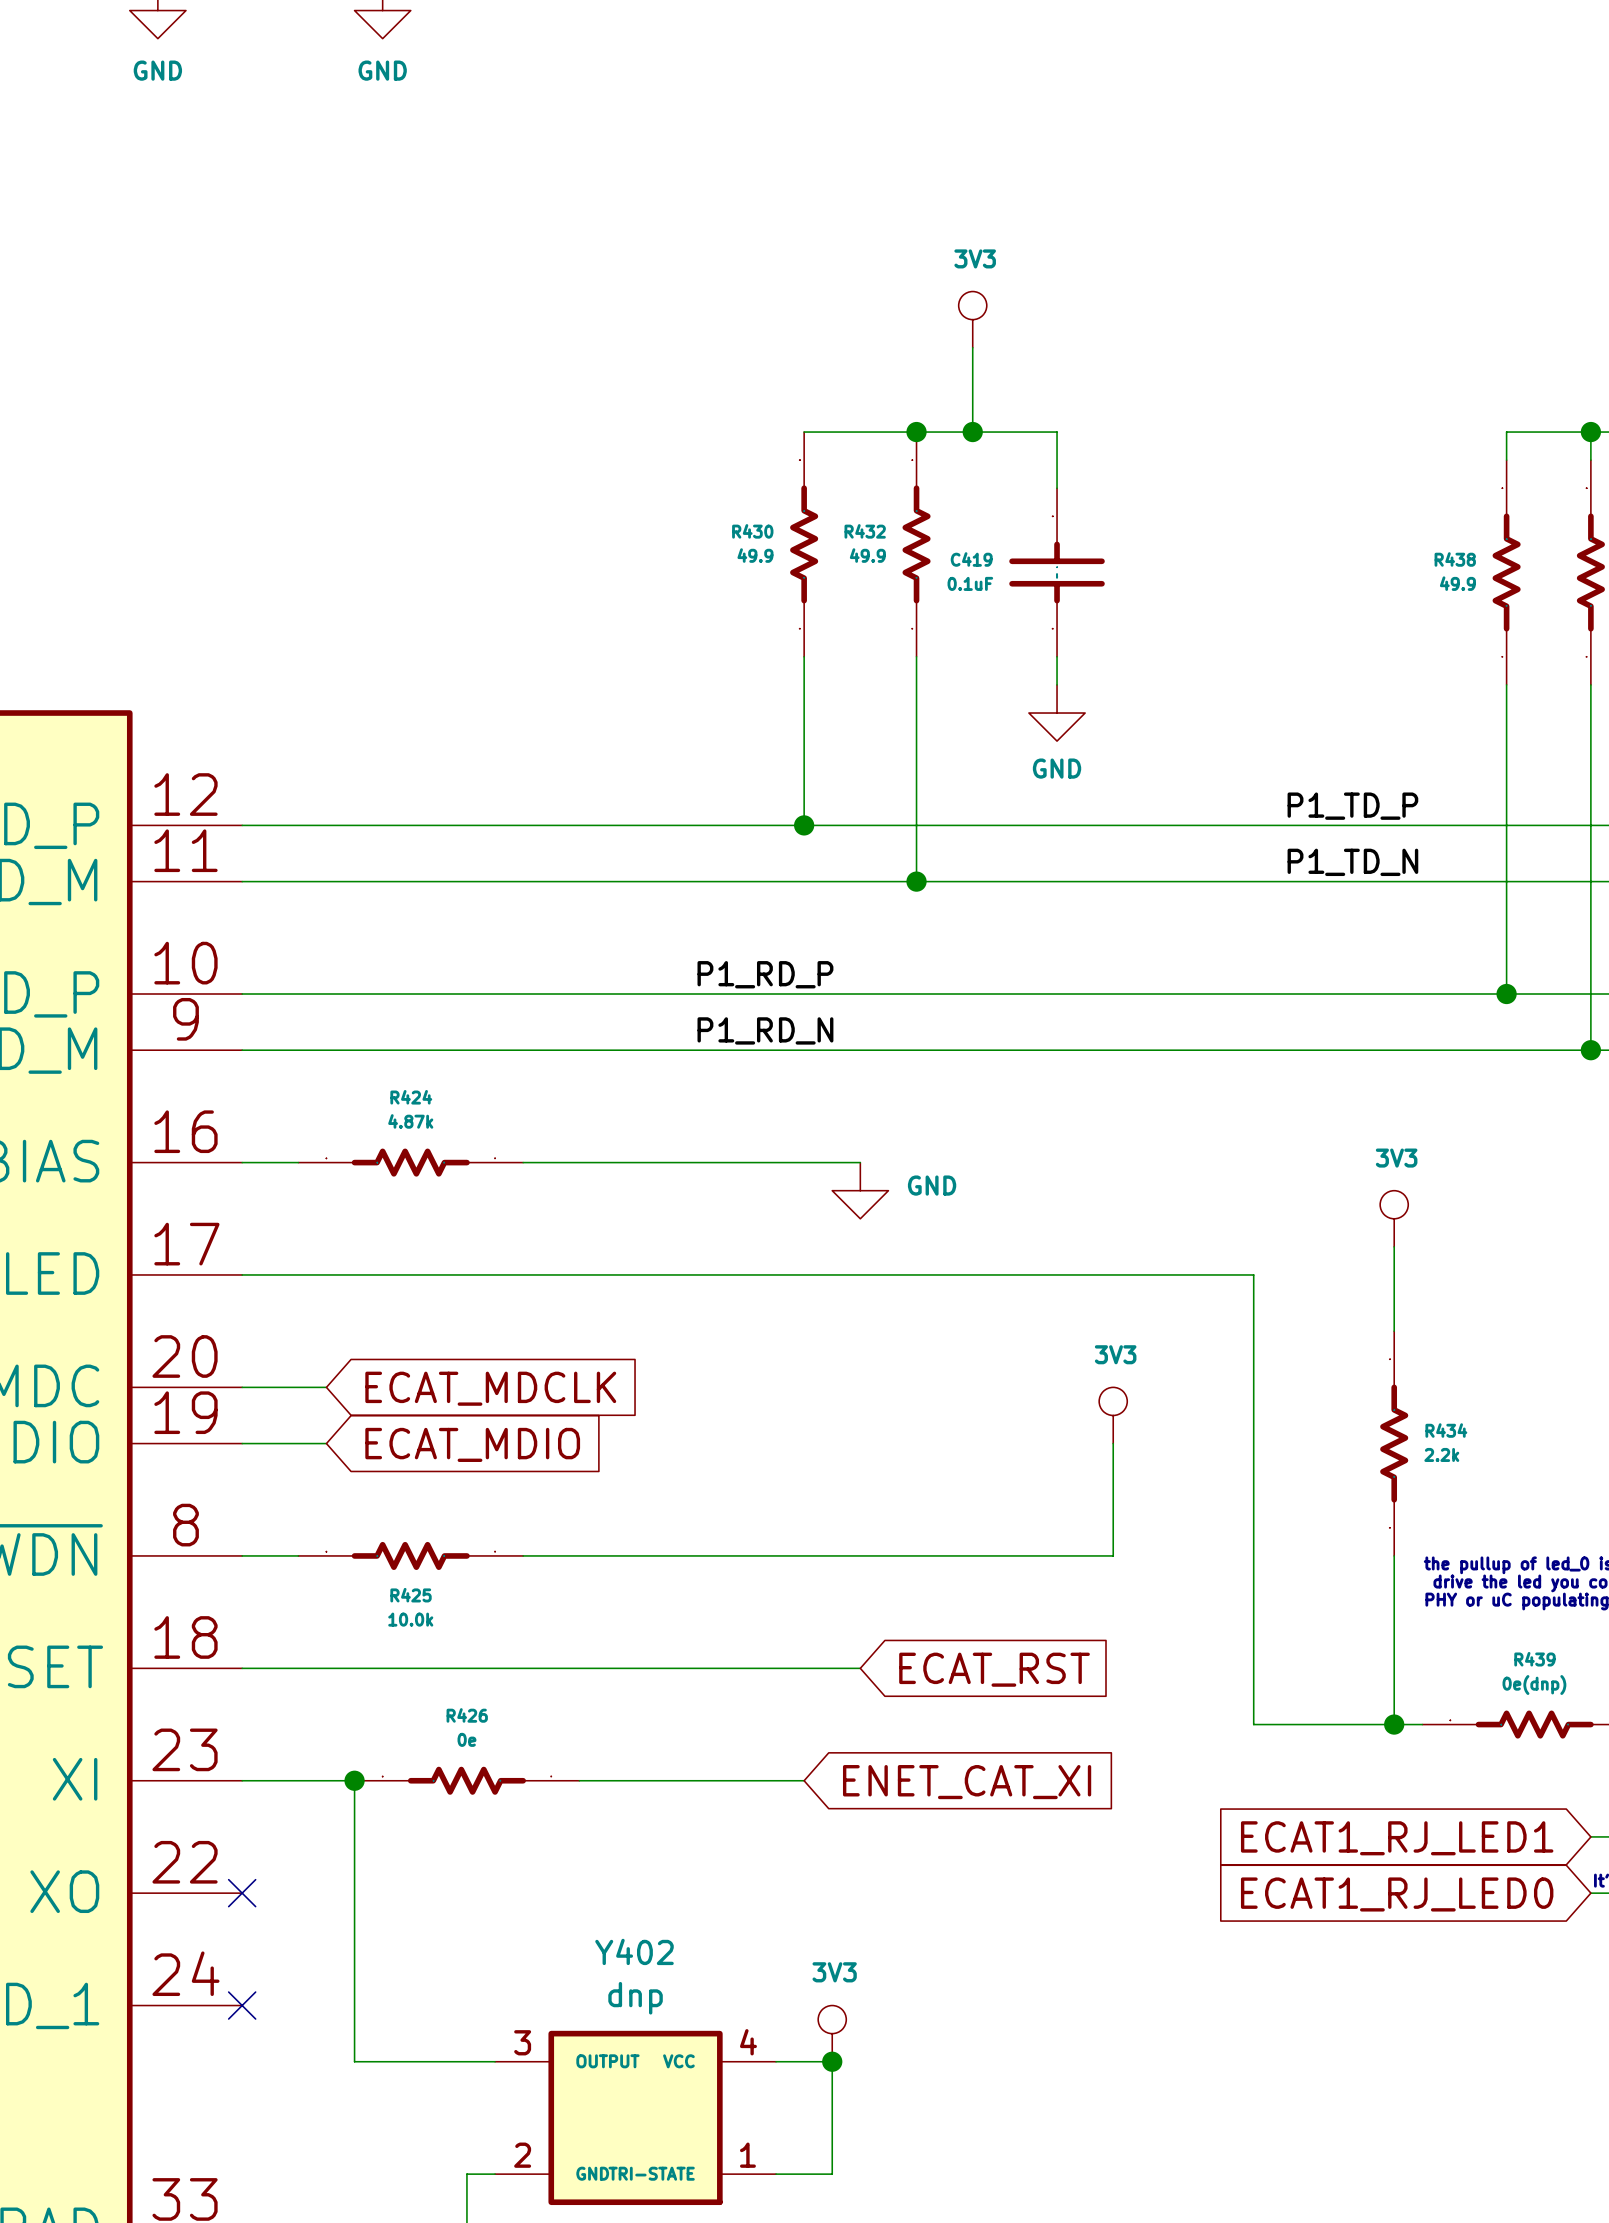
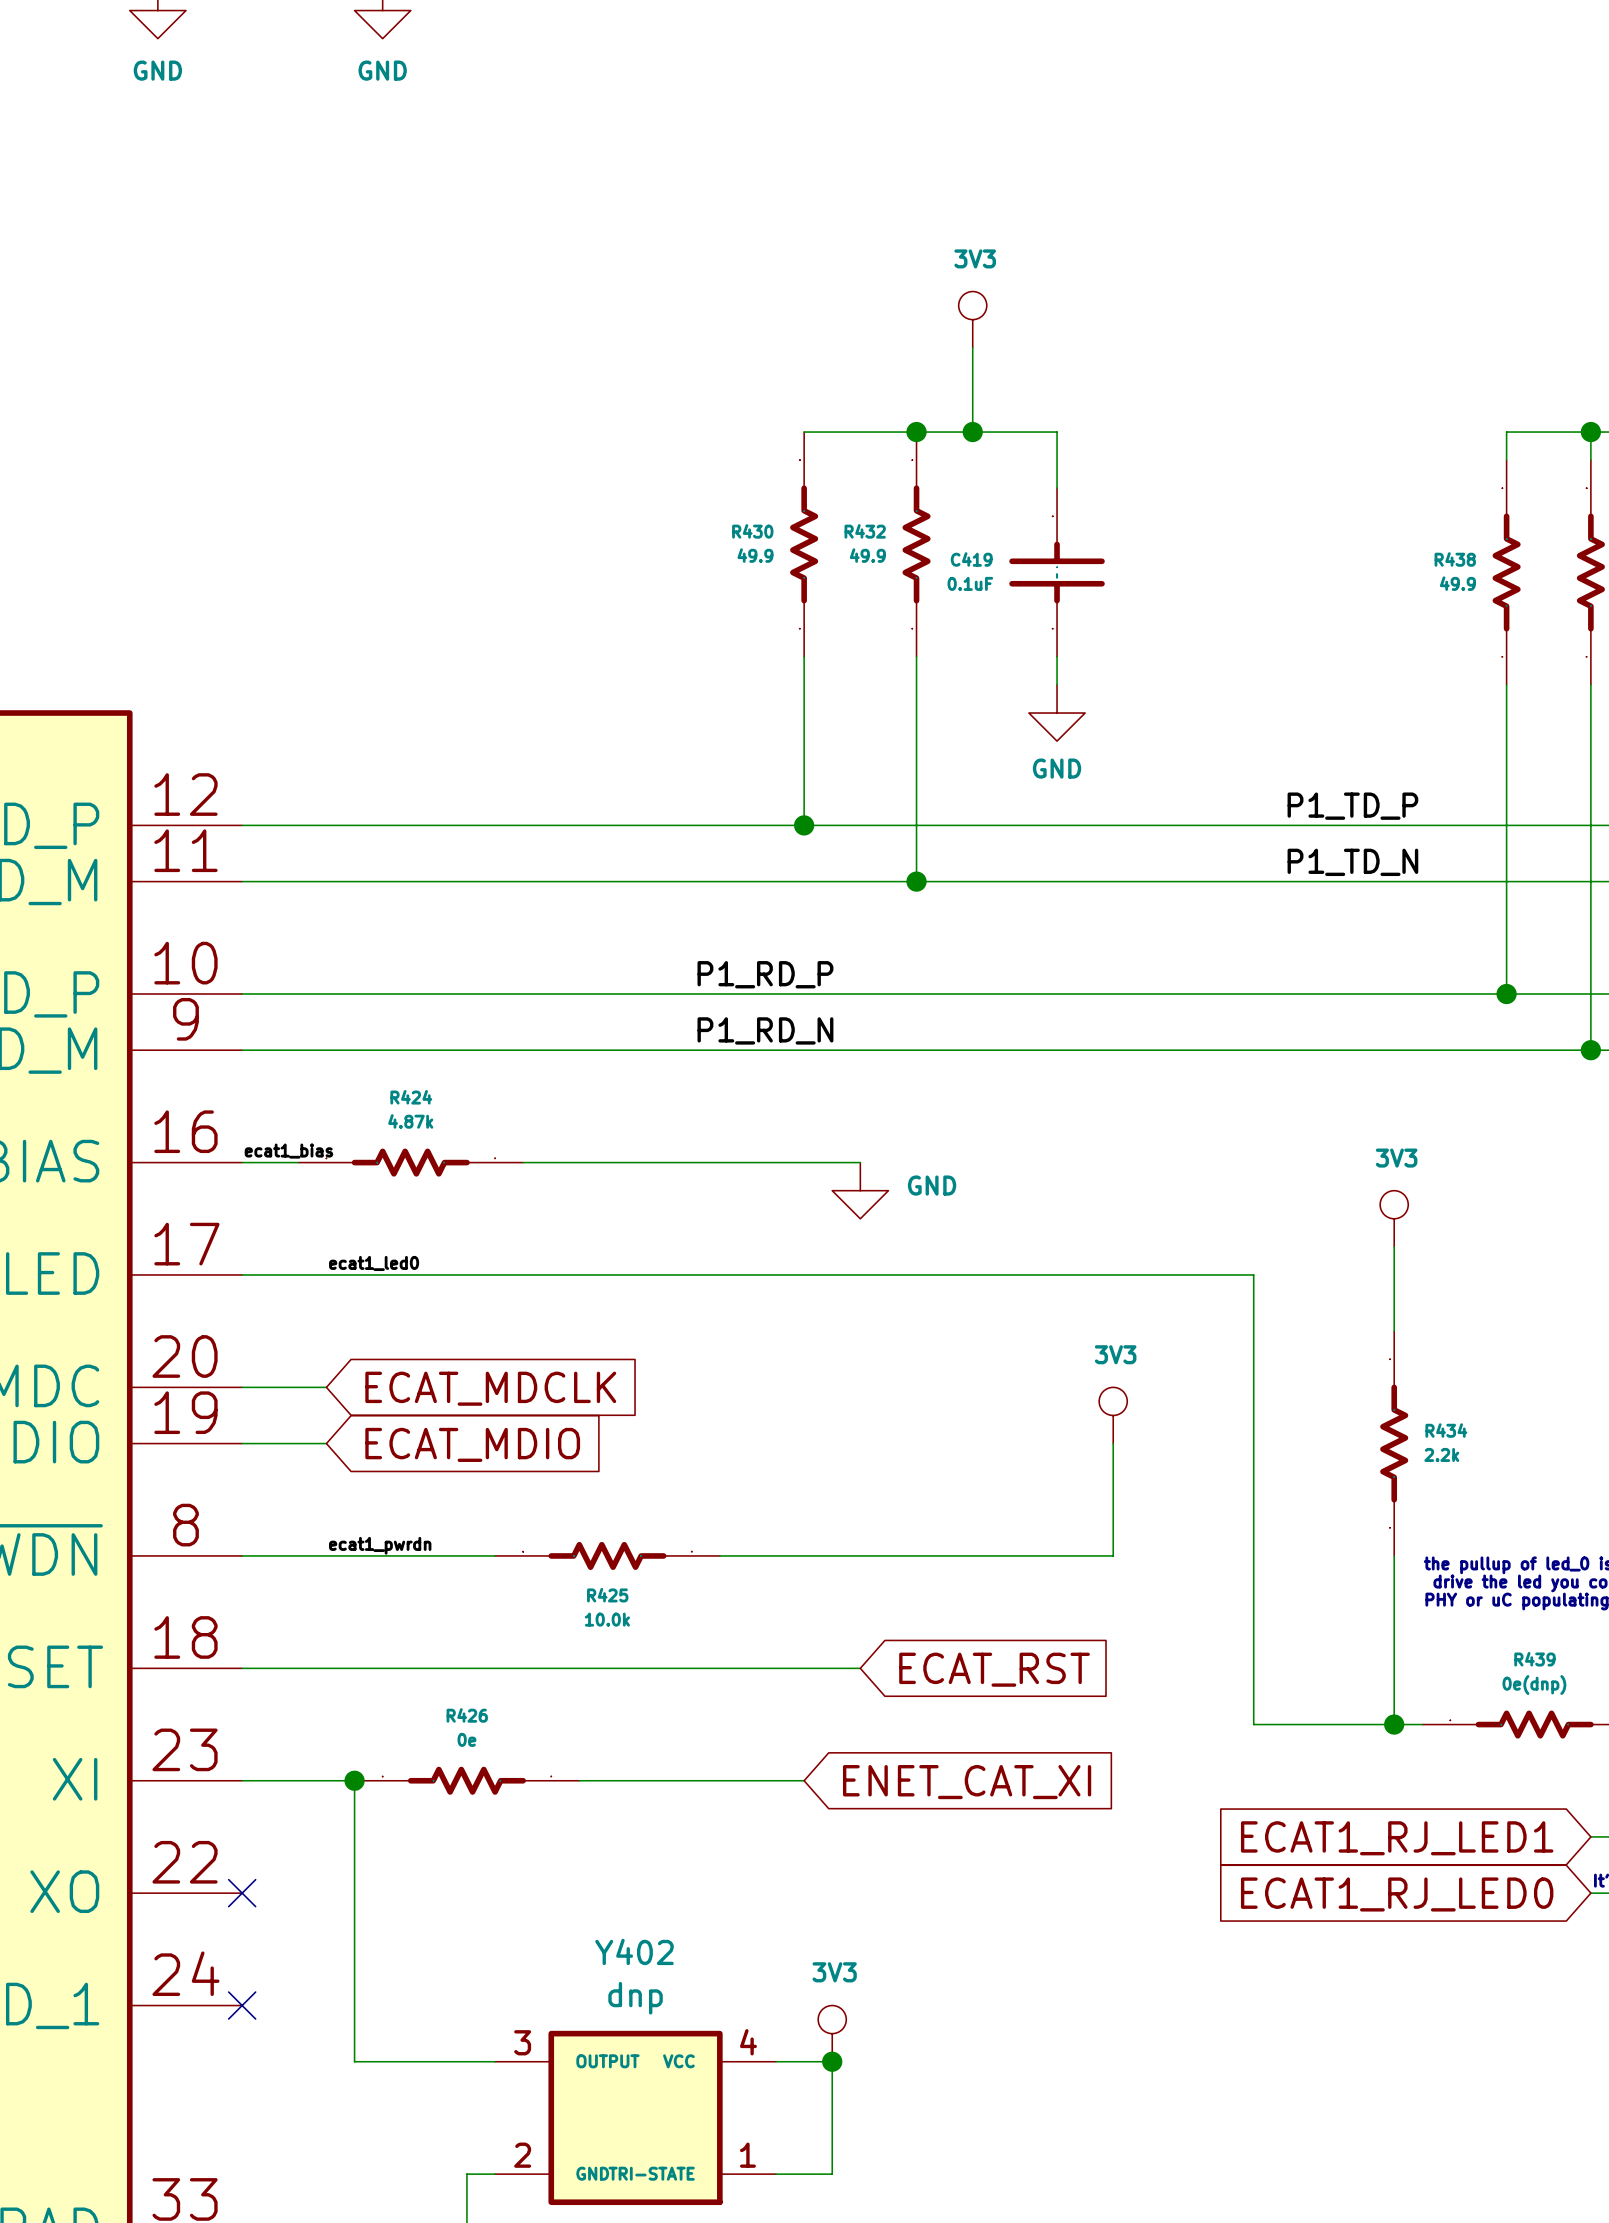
label: none -> ecat1_bias (288, 1151)
label: none -> ecat1_led0 (374, 1263)
label: none -> ecat1_pwrdn (380, 1545)
R425 position: (410, 1555) -> (607, 1555)

